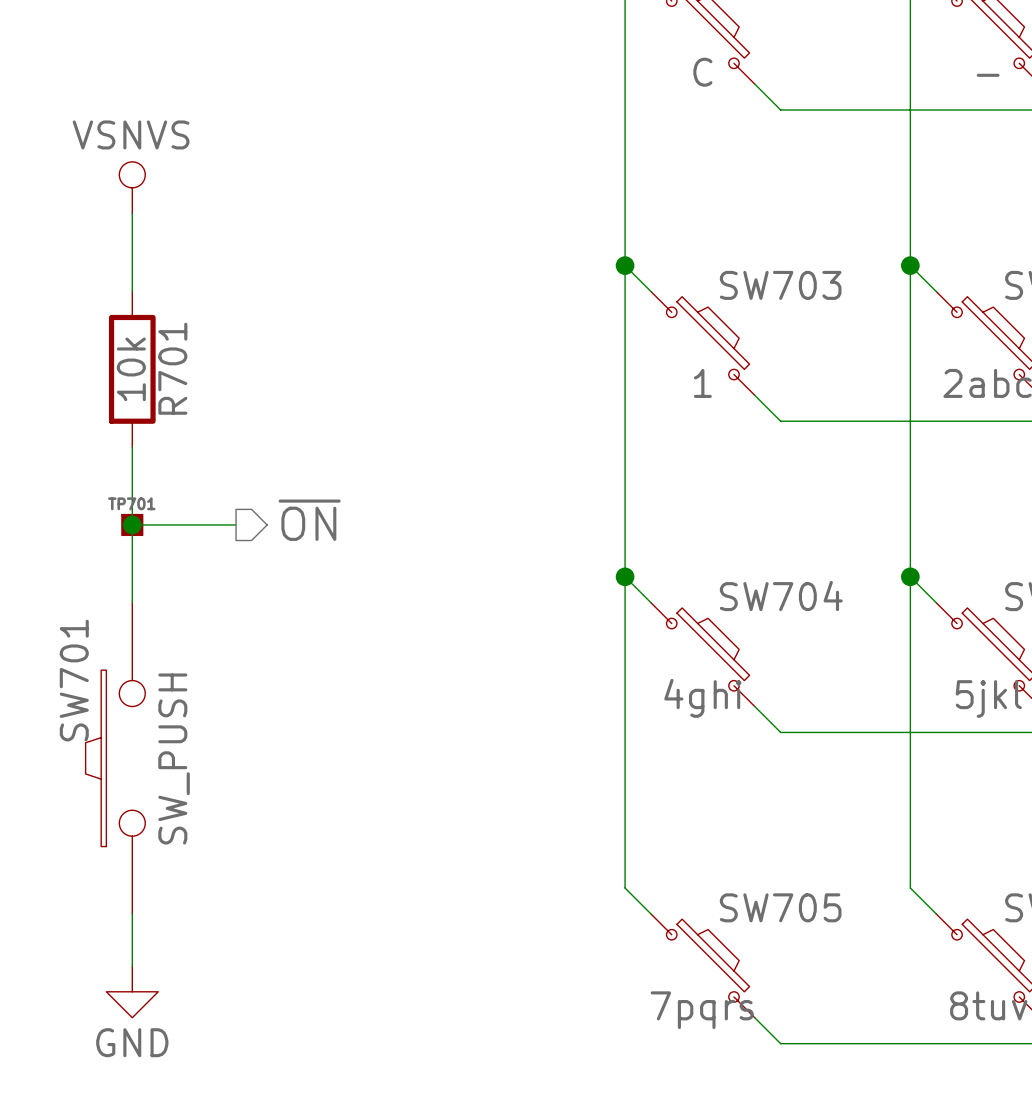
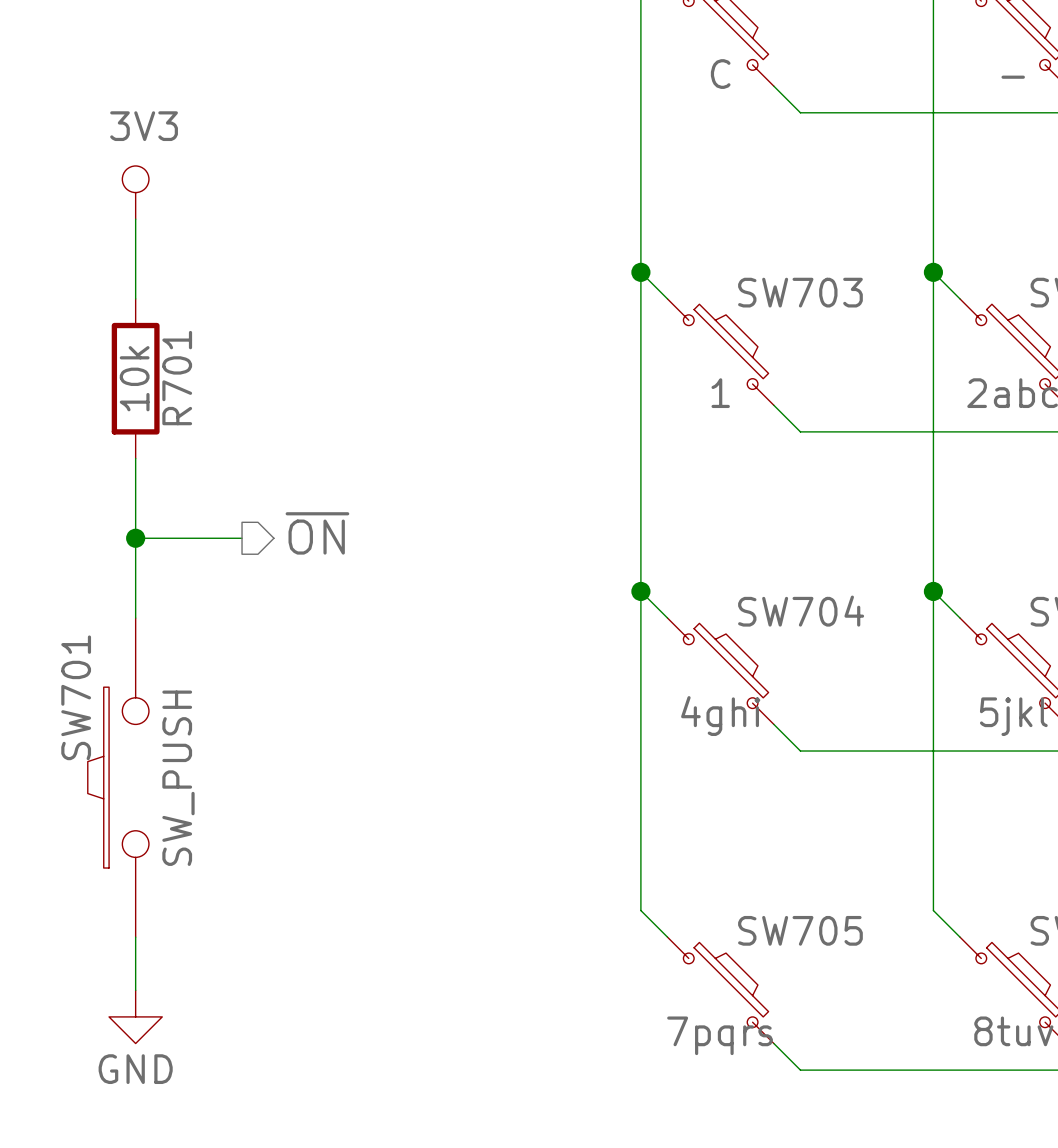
power symbol: VSNVS (132, 187) -> 3V3 (135, 192)
TP701: (132, 524) -> none

